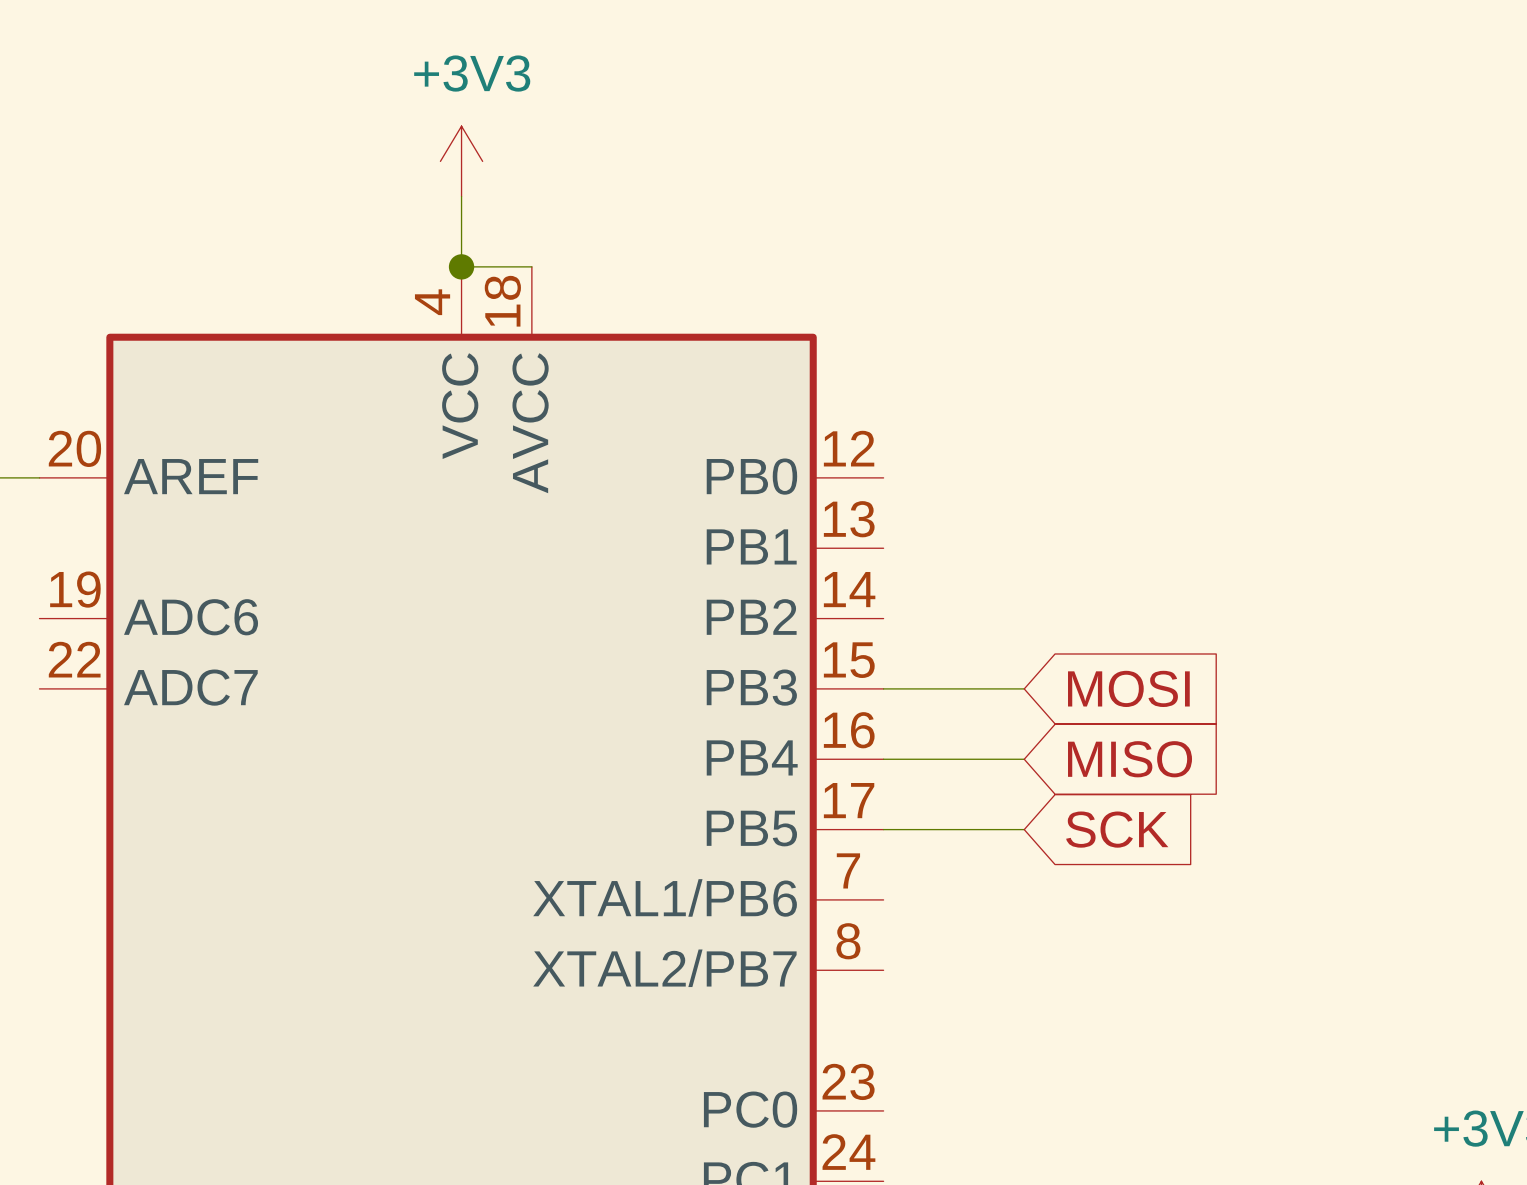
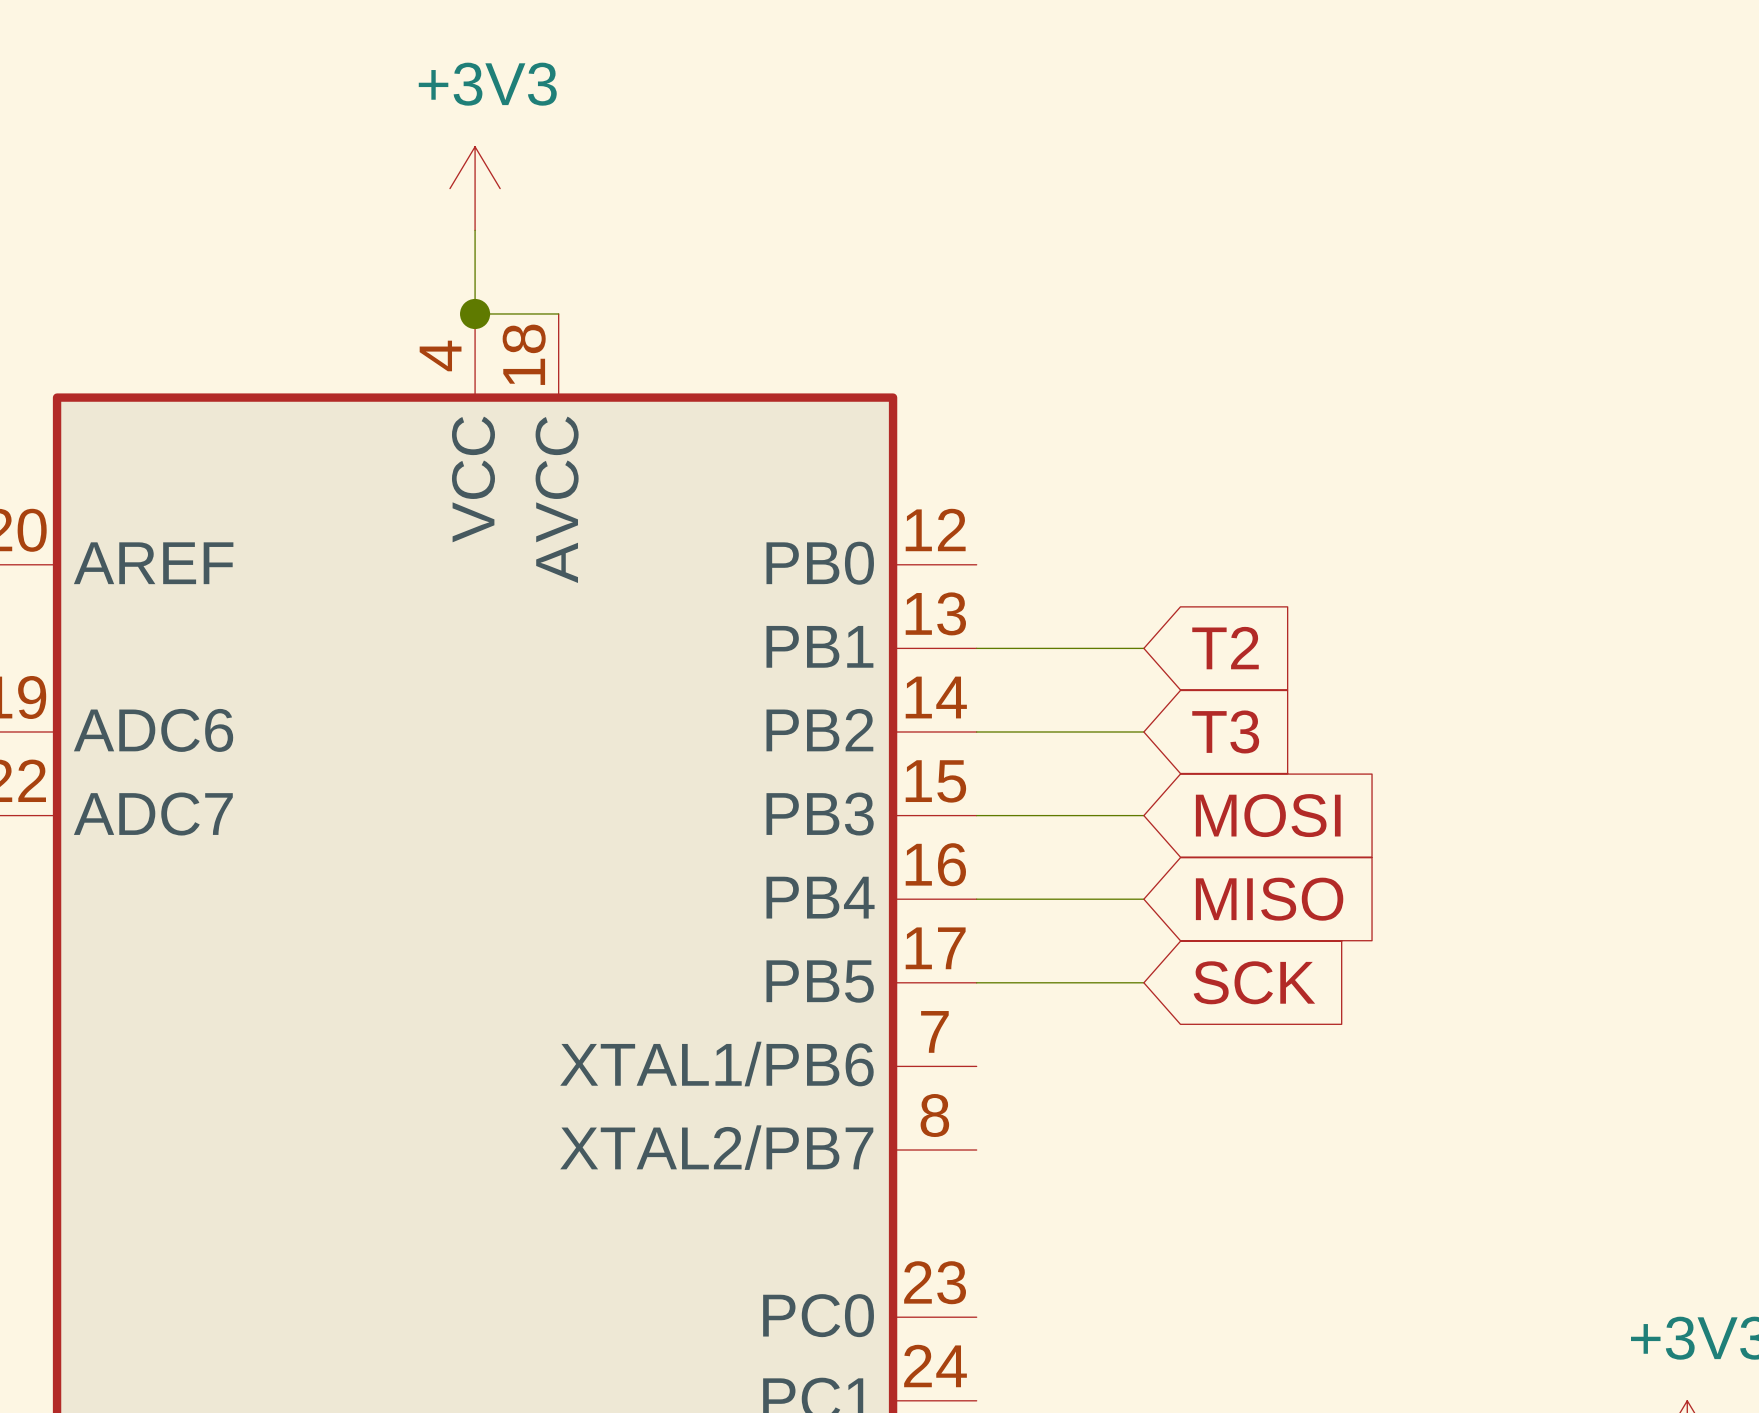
global label: none -> T2 (1225, 648)
wire: none -> (976, 648) (1143, 648)
wire: none -> (976, 731) (1143, 731)
global label: none -> T3 (1225, 731)

